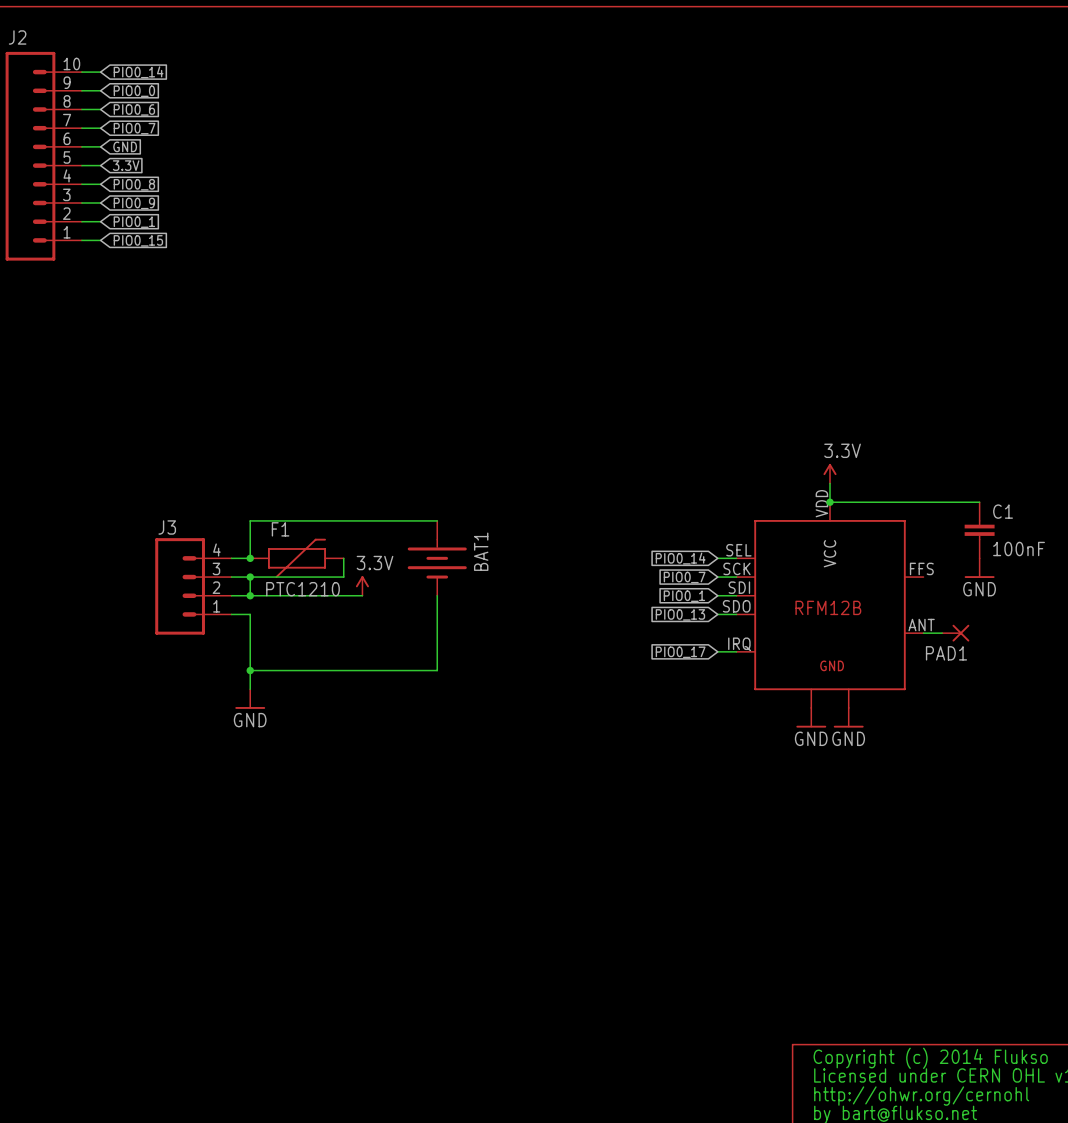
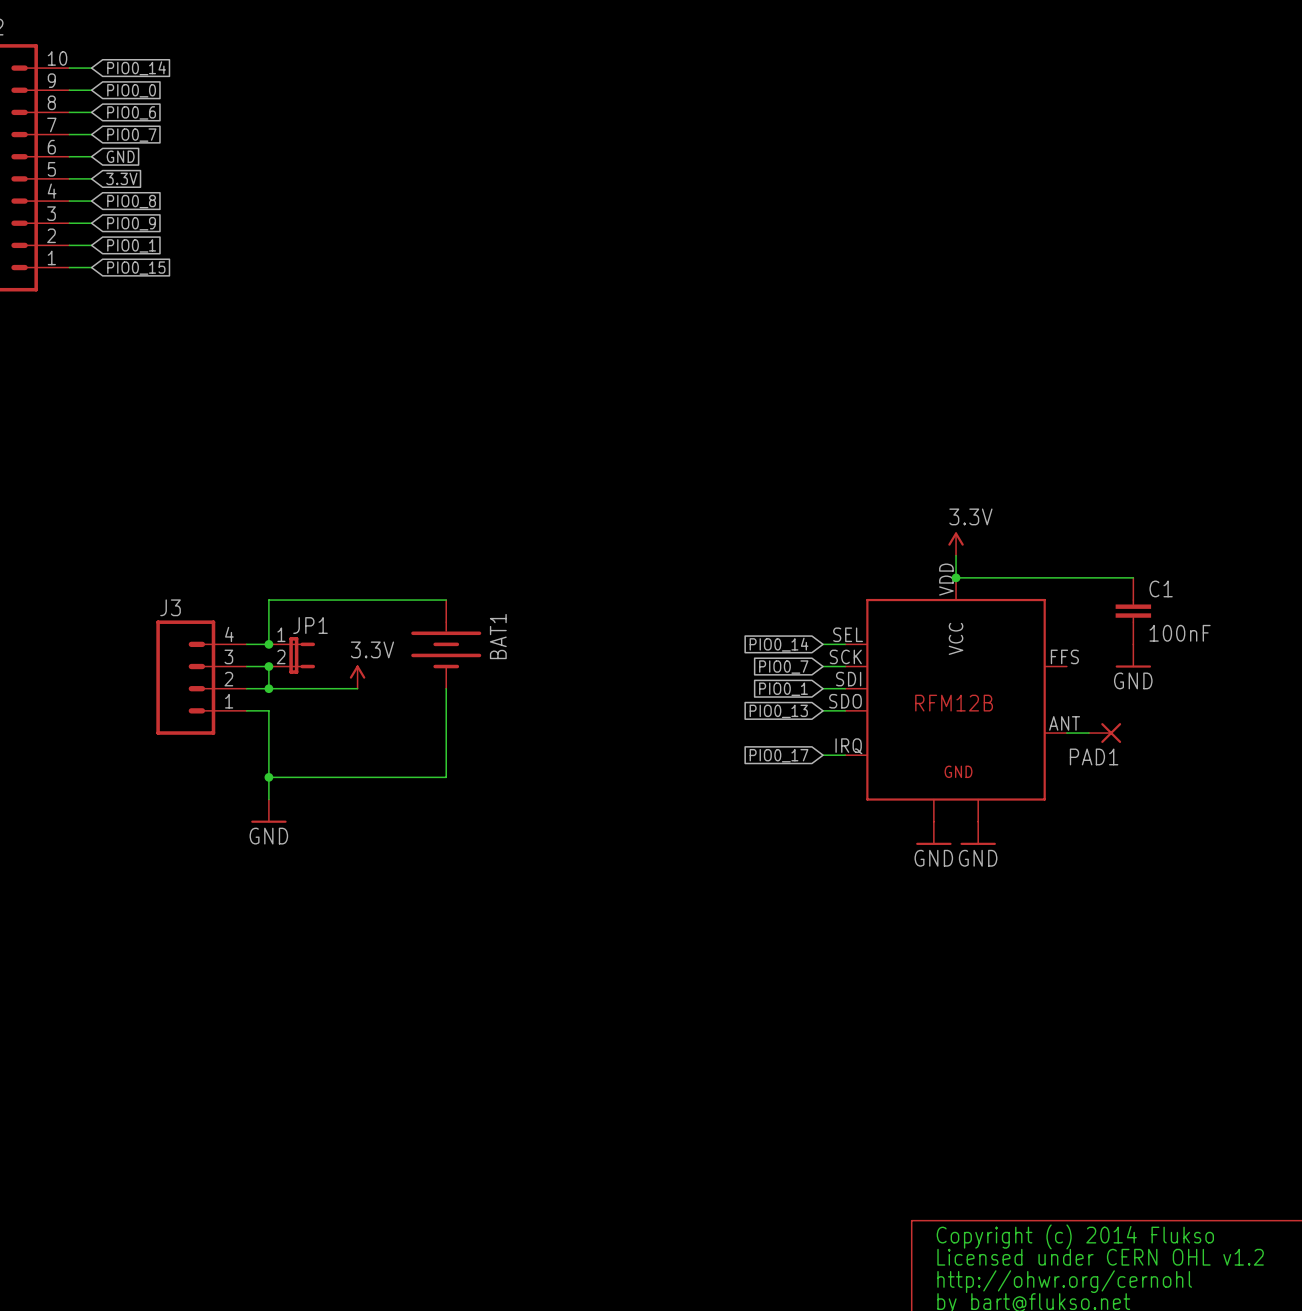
wire: (399, 520) (437, 520) -> none
F1: PTC1210 (296, 558) -> none
wire: (343, 558) (343, 577) (250, 577) -> none
BAT1 position: (437, 558) -> (446, 644)
JP1: none -> (291, 655)
power symbol position: 3.3V (362, 585) -> 3.3V (357, 677)
wire: (325, 595) (362, 595) -> none
wire: (437, 595) (437, 670) (399, 670) -> (446, 688) (446, 777)

